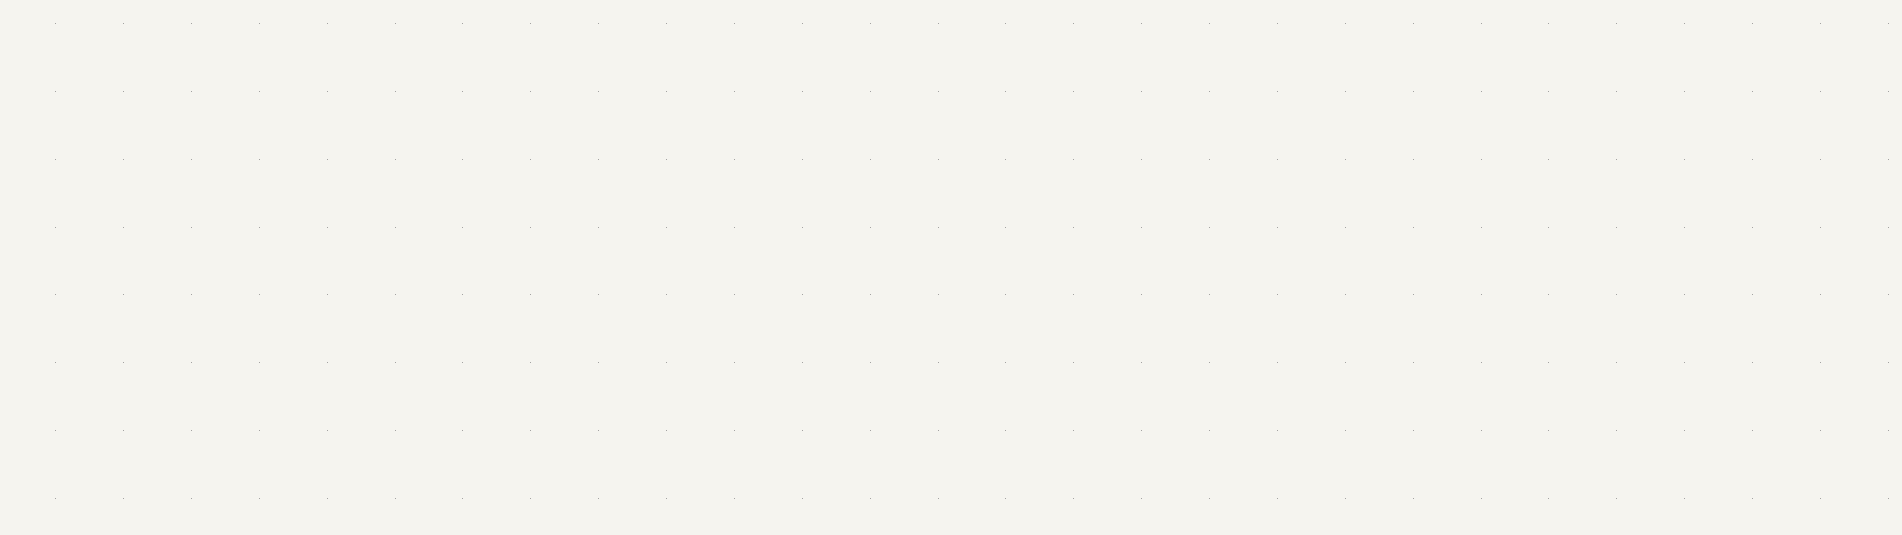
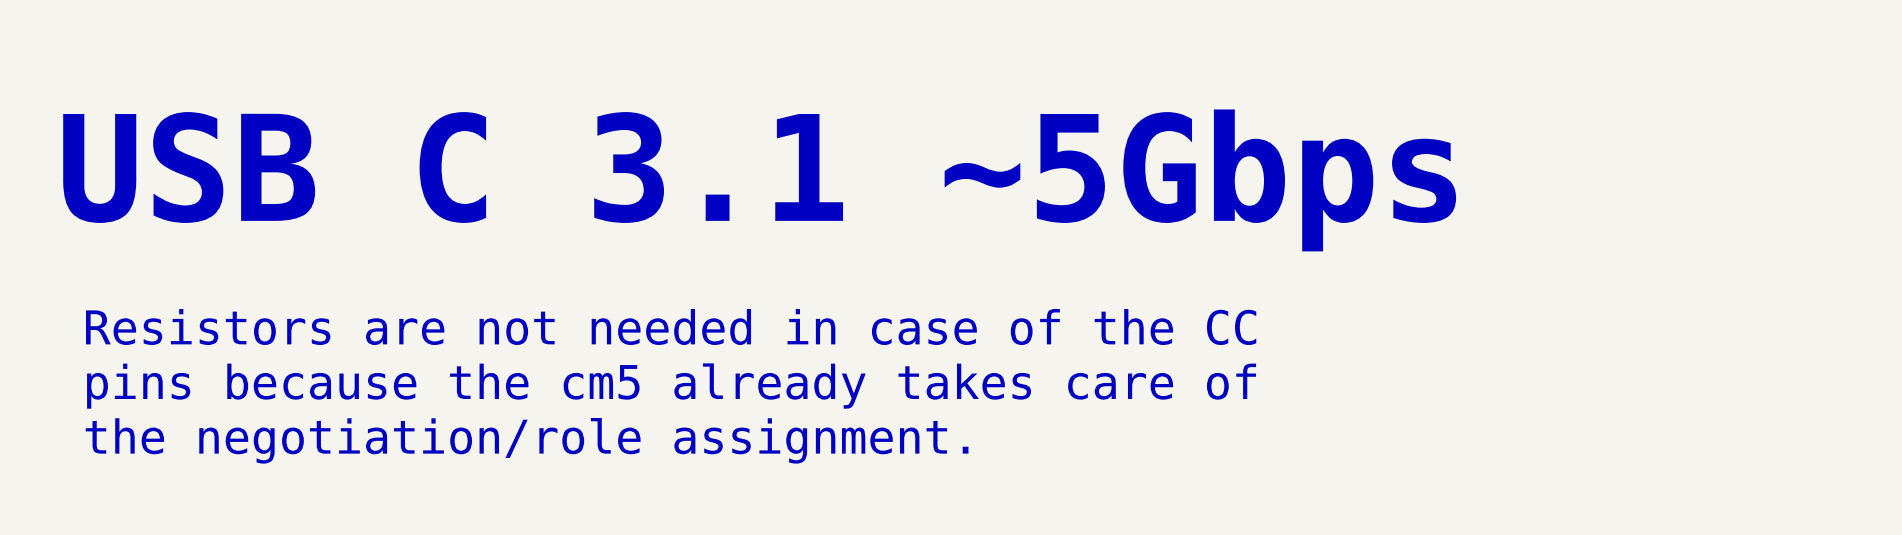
text: none -> USB C 3.1 ~5Gbps (759, 180)
text: none -> Resistors are not needed in case of the CC (671, 326)
text: none -> pins because the cm5 already takes care of (671, 386)
text: none -> the negotiation/role assignment. (527, 440)

